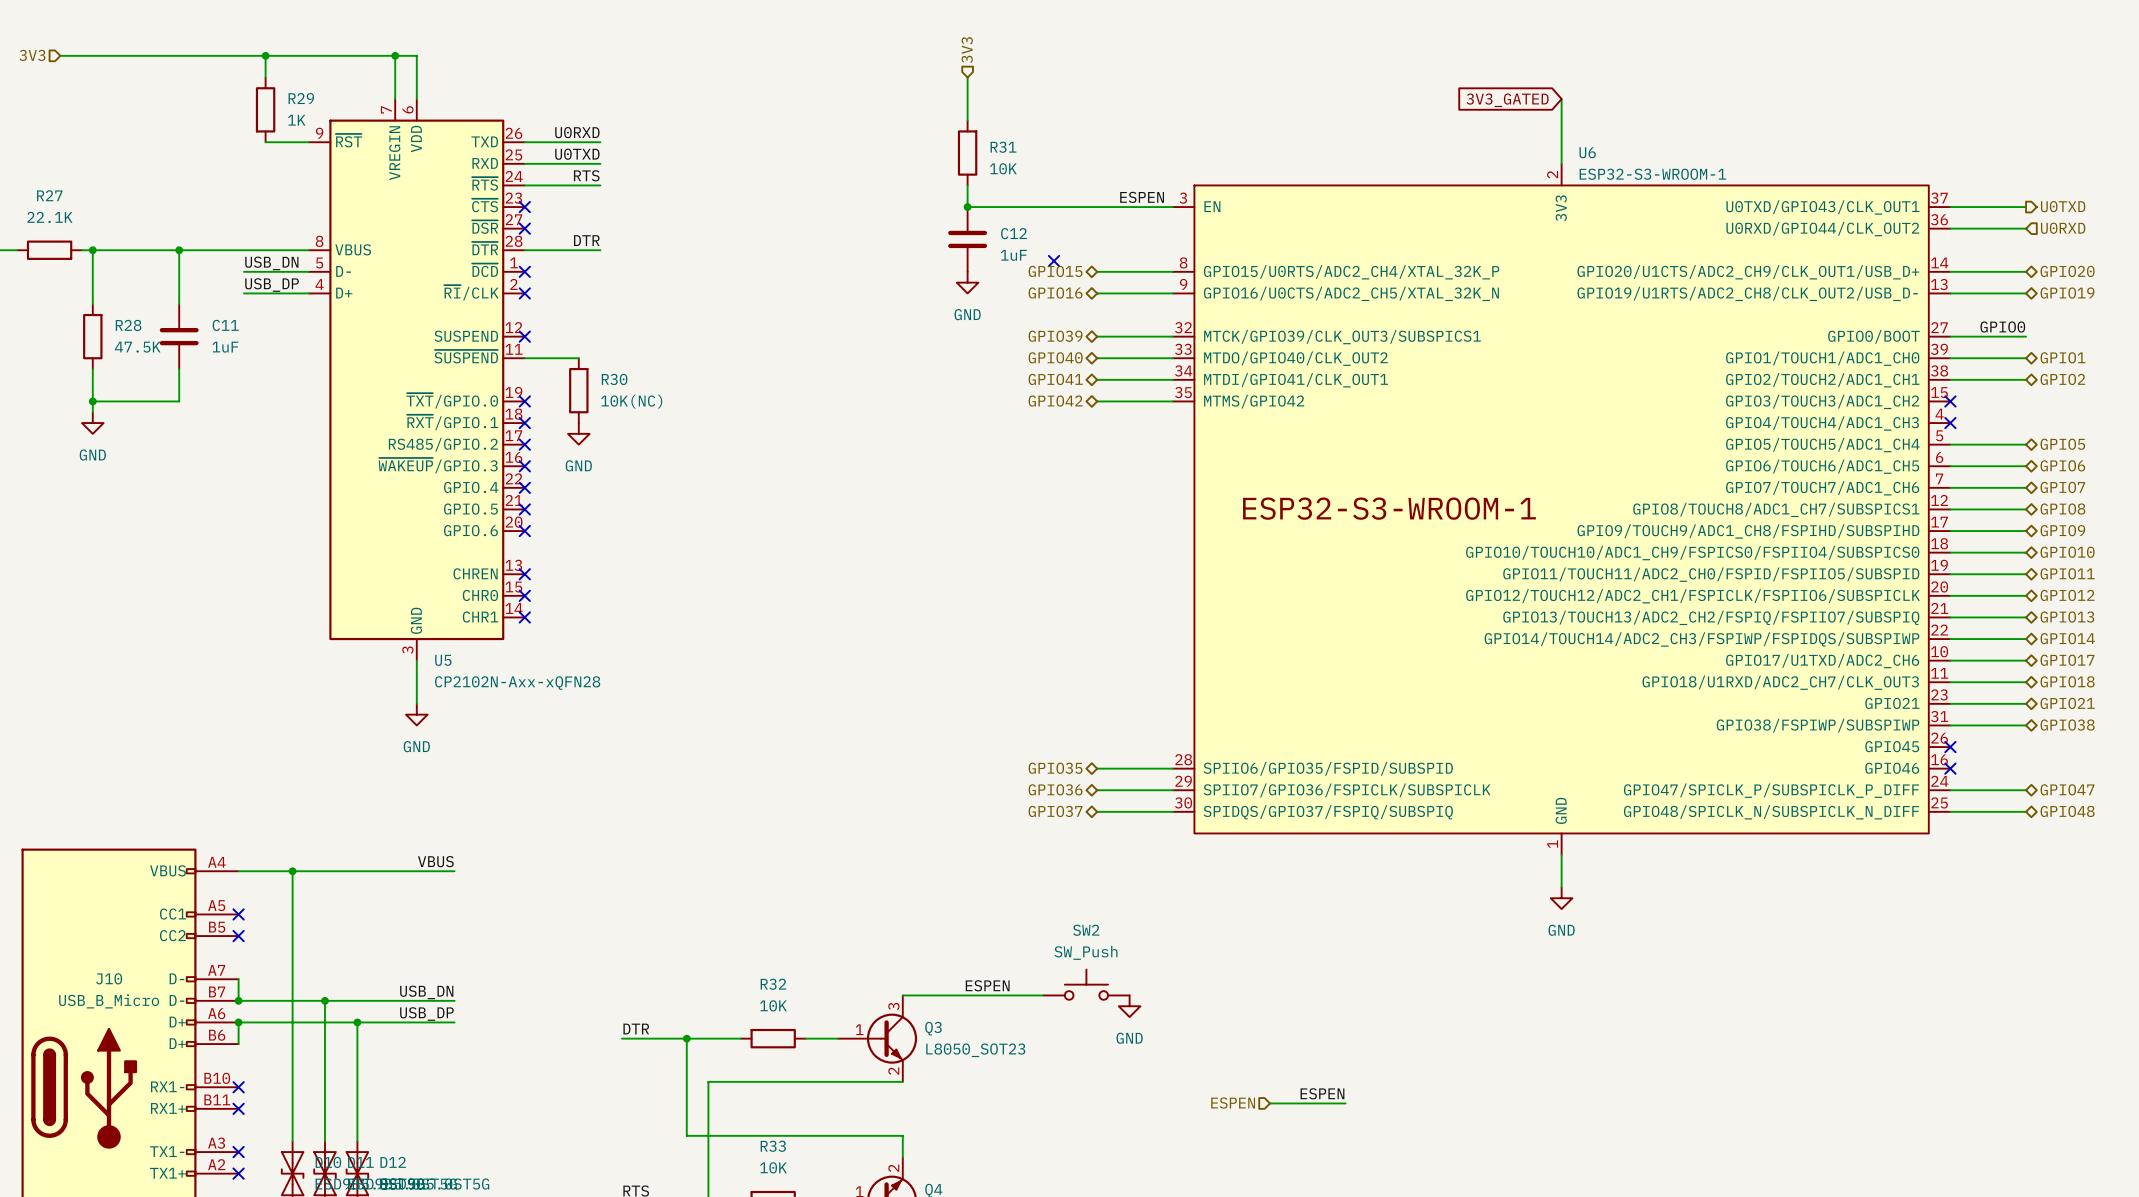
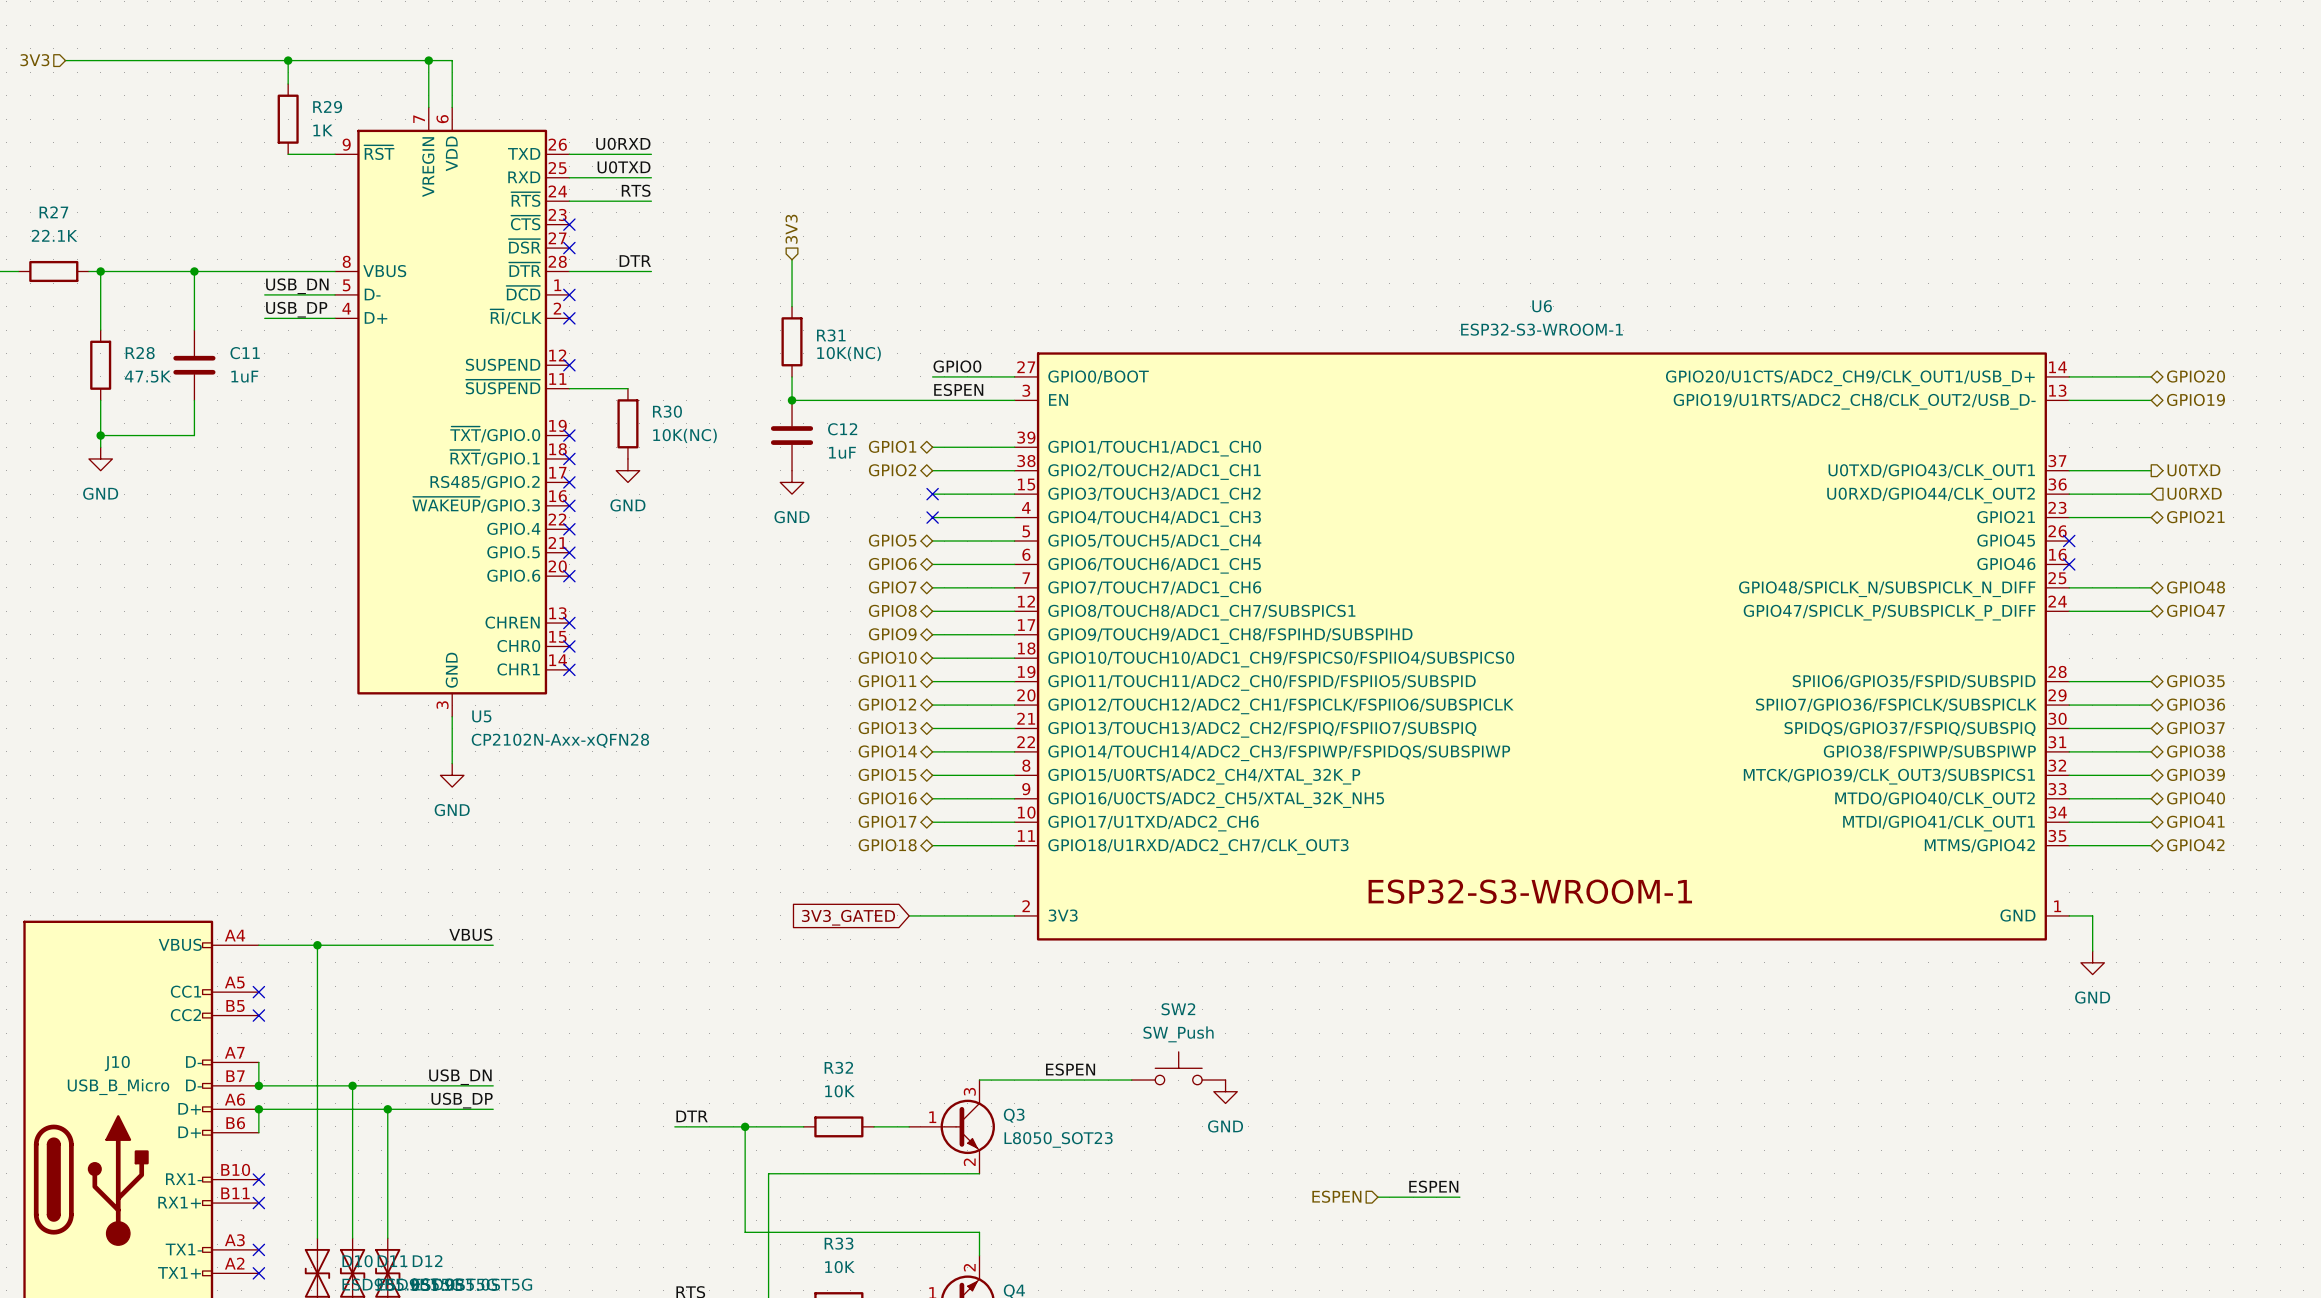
hierarchical label: 3V3 (967, 50) -> none
wire: (967, 77) (967, 120) -> none
wire: (1561, 99) (1561, 163) -> none
global label: 3V3_GATED (1507, 100) -> none
U6 name position: U6 (1587, 152) -> U6 (1542, 306)
R31 position: (967, 153) -> (792, 341)
U6 symbol: [1172, 163, 1951, 856] -> [1014, 352, 2070, 941]
R31 value: 10K (1003, 168) -> 10K(NC) (849, 353)
U6 value position: ESP32-S3-WROOM-1 (1652, 174) -> ESP32-S3-WROOM-1 (1541, 329)
wire: (967, 185) (967, 207) (1172, 207) -> none
label: ESPEN (1142, 197) -> none
hierarchical label: U0TXD (2063, 206) -> none
junction: (967, 207) -> none
wire: (1950, 207) (2026, 207) -> none
hierarchical label: none -> 3V3 (791, 229)
wire: (1950, 228) (2026, 228) -> none
hierarchical label: U0RXD (2063, 228) -> none
wire: none -> (792, 259) (792, 306)
C12 position: (967, 239) -> (792, 435)
no-connect mark: (1054, 261) -> none
hierarchical label: GPIO15 (1055, 271) -> none
wire: (1097, 271) (1172, 271) -> none
wire: (1950, 271) (2026, 271) -> (2069, 376) (2151, 376)
hierarchical label position: GPIO20 (2067, 271) -> GPIO20 (2196, 376)
power symbol: GND (967, 282) -> none
hierarchical label: GPIO16 (1055, 293) -> none
wire: (1097, 293) (1172, 293) -> none
wire: (1950, 293) (2026, 293) -> (2069, 400) (2151, 400)
hierarchical label position: GPIO19 (2067, 293) -> GPIO19 (2196, 399)
label: GPIO0 (2002, 327) -> none
hierarchical label: GPIO39 (1055, 336) -> none
wire: (1950, 336) (2026, 336) -> none
label: none -> GPIO0 (957, 366)
wire: none -> (792, 376) (792, 400) (1014, 400)
wire: none -> (932, 376) (1014, 376)
hierarchical label: GPIO40 (1055, 357) -> none
hierarchical label: GPIO1 (2063, 357) -> none
wire: (1950, 358) (2026, 358) -> (2069, 470) (2151, 470)
label: none -> ESPEN (958, 389)
junction: none -> (792, 400)
hierarchical label: GPIO41 (1055, 379) -> none
wire: (1950, 379) (2026, 379) -> (2069, 494) (2151, 494)
hierarchical label: GPIO2 (2062, 379) -> none
hierarchical label: GPIO42 (1055, 401) -> none
no-connect mark: (1950, 401) -> none
hierarchical label: none -> GPIO1 (892, 446)
wire: none -> (932, 447) (1014, 447)
no-connect mark: (1950, 423) -> none
hierarchical label: none -> GPIO2 (892, 470)
wire: none -> (932, 470) (1014, 470)
hierarchical label: none -> U0TXD (2193, 470)
power symbol: none -> GND (792, 482)
wire: (1950, 444) (2026, 444) -> none
hierarchical label: GPIO5 (2062, 444) -> none
wire: none -> (932, 494) (1014, 494)
no-connect mark: none -> (932, 494)
hierarchical label: none -> U0RXD (2194, 493)
hierarchical label: GPIO6 (2062, 465) -> none
wire: (1950, 466) (2026, 466) -> (2069, 587) (2151, 587)
hierarchical label: none -> GPIO21 (2195, 517)
wire: none -> (932, 517) (1014, 517)
no-connect mark: none -> (932, 517)
wire: (1950, 487) (2026, 487) -> (2069, 611) (2151, 611)
hierarchical label: GPIO7 (2062, 487) -> none
hierarchical label: none -> GPIO5 (892, 540)
wire: none -> (932, 541) (1014, 541)
no-connect mark: none -> (2069, 541)
wire: (1950, 509) (2026, 509) -> (2069, 517) (2151, 517)
hierarchical label: GPIO8 (2062, 509) -> none
hierarchical label: none -> GPIO6 (892, 564)
wire: none -> (932, 564) (1014, 564)
no-connect mark: none -> (2069, 564)
hierarchical label: GPIO9 (2062, 530) -> none
wire: (1950, 531) (2026, 531) -> none
hierarchical label: none -> GPIO7 (892, 587)
wire: none -> (932, 587) (1014, 587)
hierarchical label: none -> GPIO48 (2196, 587)
wire: (1950, 552) (2026, 552) -> (2069, 681) (2151, 681)
hierarchical label: GPIO10 (2067, 552) -> none
hierarchical label: none -> GPIO8 (892, 610)
wire: none -> (932, 611) (1014, 611)
hierarchical label: none -> GPIO47 (2195, 610)
hierarchical label: GPIO11 (2067, 573) -> none
wire: (1950, 574) (2026, 574) -> (2069, 705) (2151, 705)
hierarchical label: none -> GPIO9 (892, 634)
wire: none -> (932, 634) (1014, 634)
wire: (1950, 595) (2026, 595) -> (2069, 728) (2151, 728)
hierarchical label: GPIO12 (2067, 595) -> none
hierarchical label: none -> GPIO10 (887, 657)
wire: none -> (932, 658) (1014, 658)
wire: (1950, 617) (2026, 617) -> (2069, 751) (2151, 751)
hierarchical label: GPIO13 (2067, 617) -> none
hierarchical label: none -> GPIO11 (887, 681)
hierarchical label: none -> GPIO35 (2195, 681)
wire: none -> (932, 681) (1014, 681)
hierarchical label: GPIO14 (2067, 638) -> none
wire: (1950, 639) (2026, 639) -> (2069, 775) (2151, 775)
hierarchical label: none -> GPIO12 (887, 704)
wire: none -> (932, 705) (1014, 705)
hierarchical label: none -> GPIO36 (2196, 704)
wire: (1950, 660) (2026, 660) -> (2069, 798) (2151, 798)
hierarchical label: GPIO17 (2067, 660) -> none
hierarchical label: none -> GPIO13 (887, 728)
wire: none -> (932, 728) (1014, 728)
hierarchical label: none -> GPIO37 (2195, 728)
hierarchical label: GPIO18 (2067, 681) -> none
wire: (1950, 682) (2026, 682) -> (2069, 822) (2151, 822)
hierarchical label: none -> GPIO14 (887, 751)
wire: none -> (932, 751) (1014, 751)
wire: (1950, 703) (2026, 703) -> (2069, 845) (2151, 845)
hierarchical label: GPIO21 (2067, 703) -> GPIO39 (2196, 774)
hierarchical label: none -> GPIO15 (887, 774)
wire: none -> (932, 775) (1014, 775)
wire: (1950, 725) (2026, 725) -> none
hierarchical label position: GPIO38 (2067, 725) -> GPIO38 (2196, 751)
hierarchical label: none -> GPIO16 (887, 798)
hierarchical label: none -> GPIO40 (2196, 798)
wire: none -> (932, 798) (1014, 798)
no-connect mark: (1950, 747) -> none
hierarchical label: none -> GPIO17 (887, 821)
wire: none -> (932, 822) (1014, 822)
hierarchical label: none -> GPIO41 (2195, 821)
hierarchical label: GPIO35 (1055, 768) -> none
no-connect mark: (1950, 768) -> none
hierarchical label: none -> GPIO18 (887, 845)
wire: none -> (932, 845) (1014, 845)
hierarchical label: GPIO36 (1055, 789) -> none
hierarchical label: GPIO47 (2067, 789) -> GPIO42 (2195, 845)
wire: (1950, 790) (2026, 790) -> none
hierarchical label: GPIO37 (1055, 811) -> none
wire: (1950, 811) (2026, 811) -> none
hierarchical label: GPIO48 (2067, 811) -> none
wire: none -> (909, 915) (1014, 915)
wire: none -> (2069, 915) (2092, 915) (2092, 951)
global label: none -> 3V3_GATED (848, 917)
wire: (1561, 855) (1561, 887) -> none
power symbol: none -> GND (2092, 962)
power symbol: GND (1561, 898) -> none

